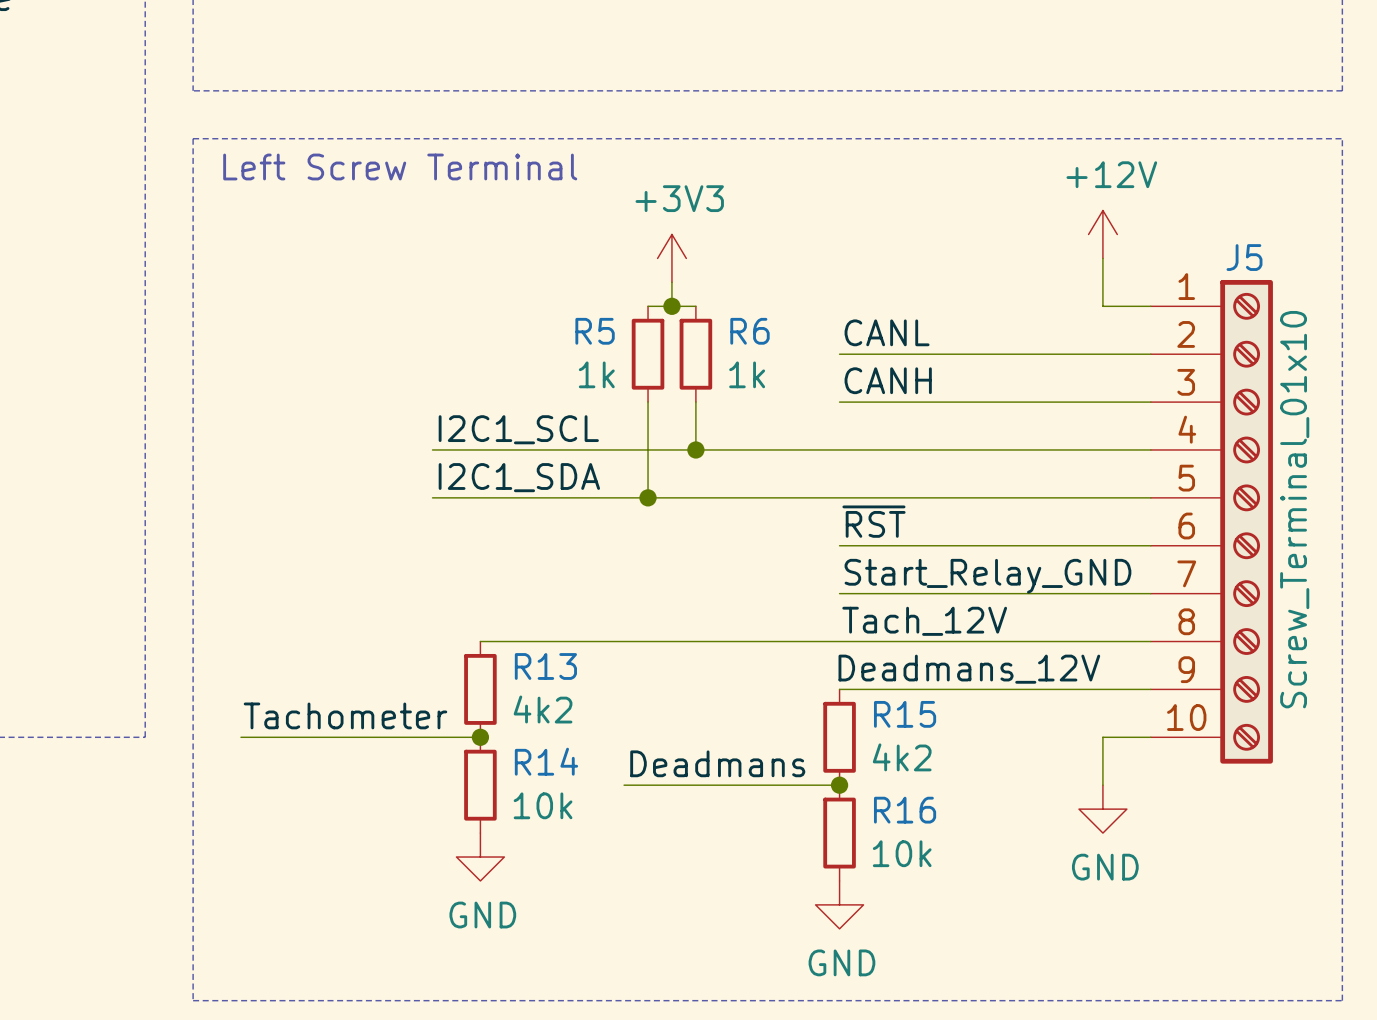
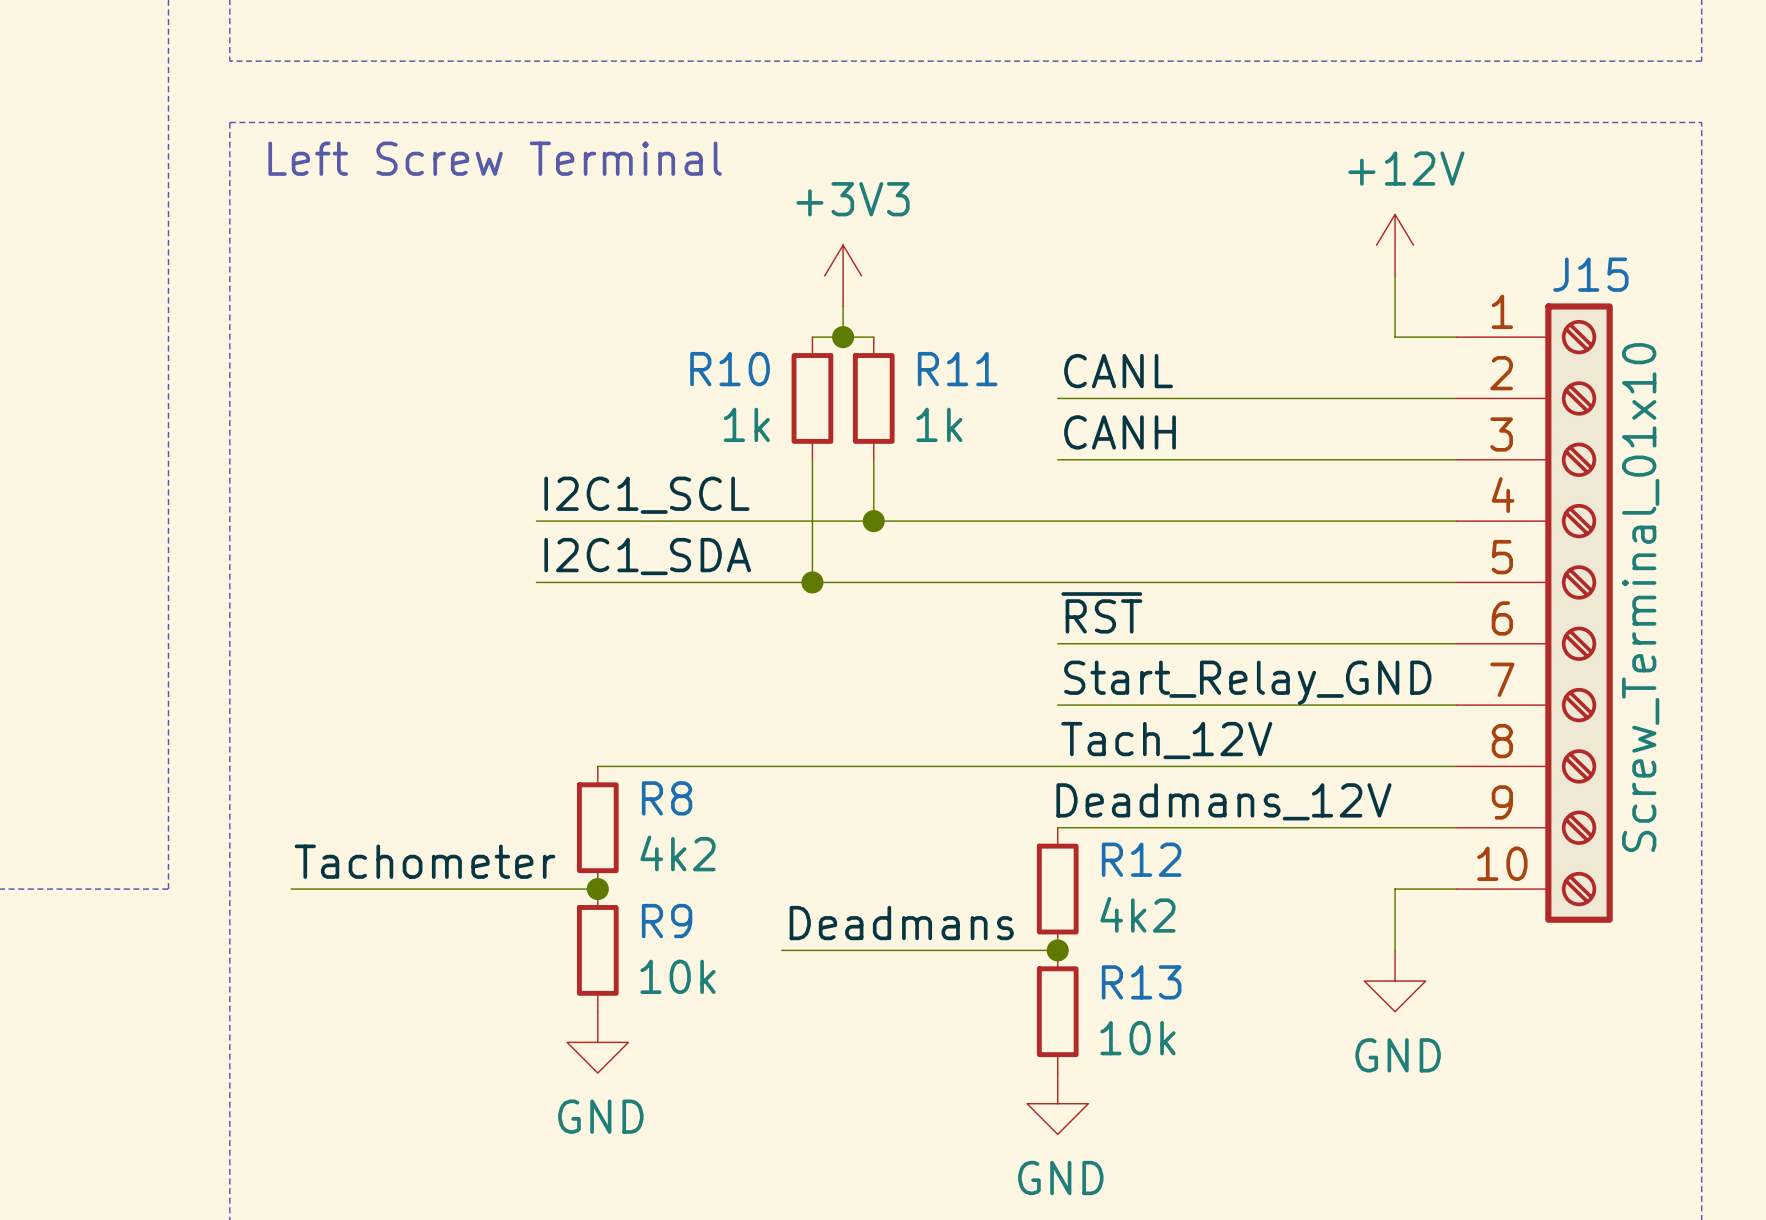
J5 name: J5 (1244, 257) -> J15 (1590, 274)
R5 name: R5 (595, 331) -> R10 (730, 369)
R6 name: R6 (749, 331) -> R11 (957, 369)
R13 name: R13 (545, 666) -> R8 (667, 798)
R15 name: R15 (905, 714) -> R12 (1141, 859)
R14 name: R14 (546, 761) -> R9 (667, 921)
R16 name: R16 (905, 810) -> R13 (1141, 982)

